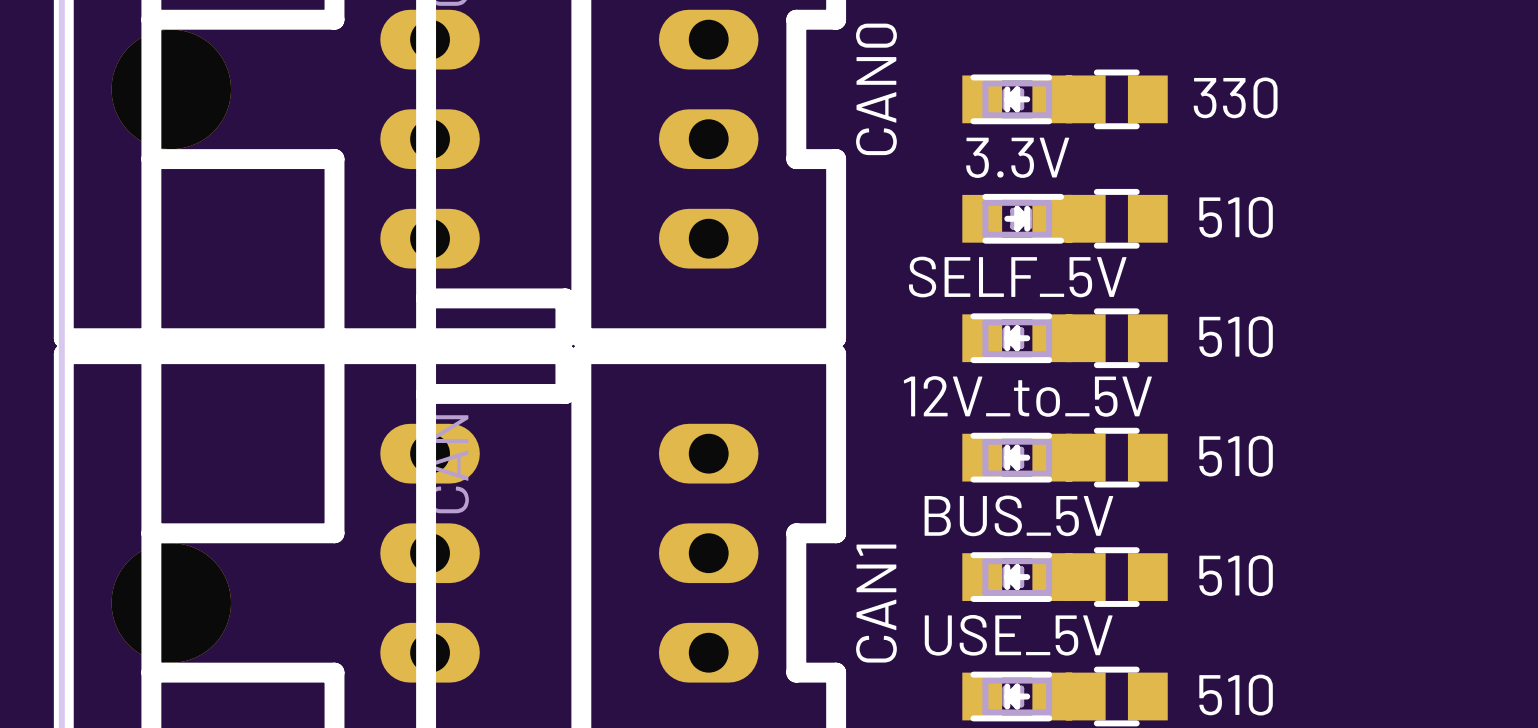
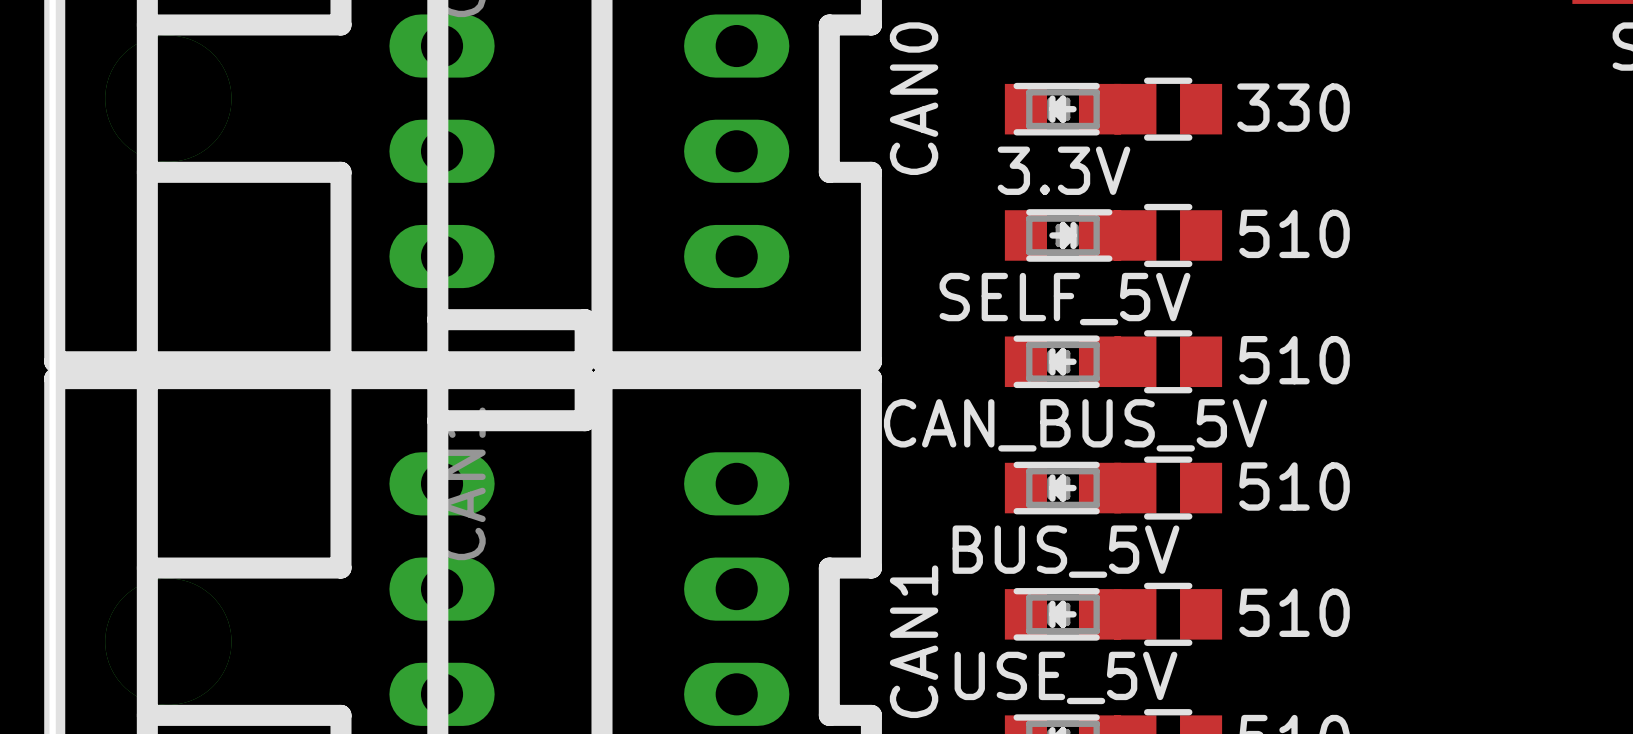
part value: 12V_to_5V (1027, 396) -> CAN_BUS_5V (1075, 425)

